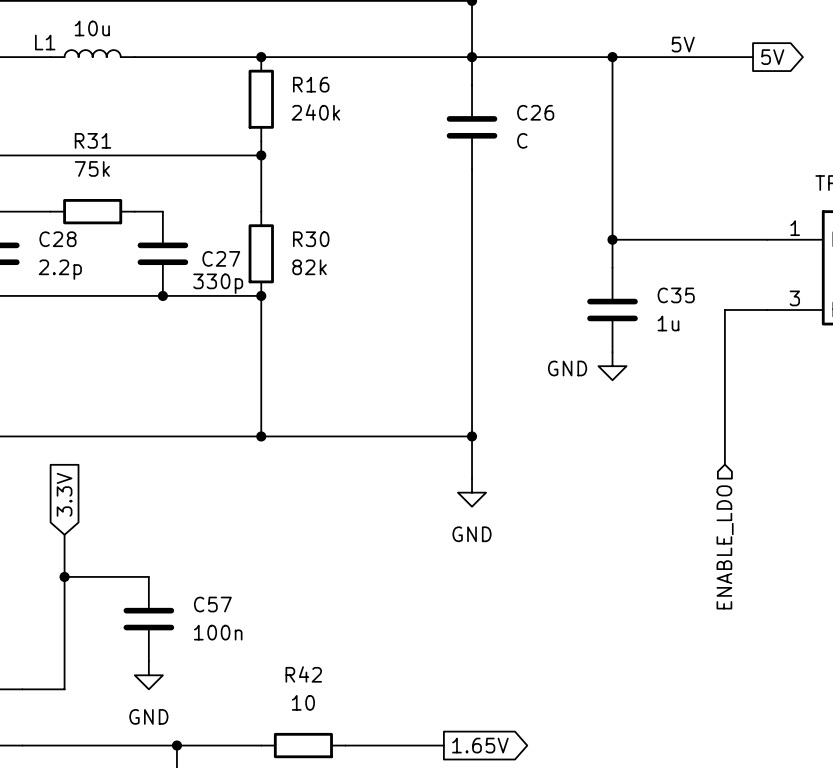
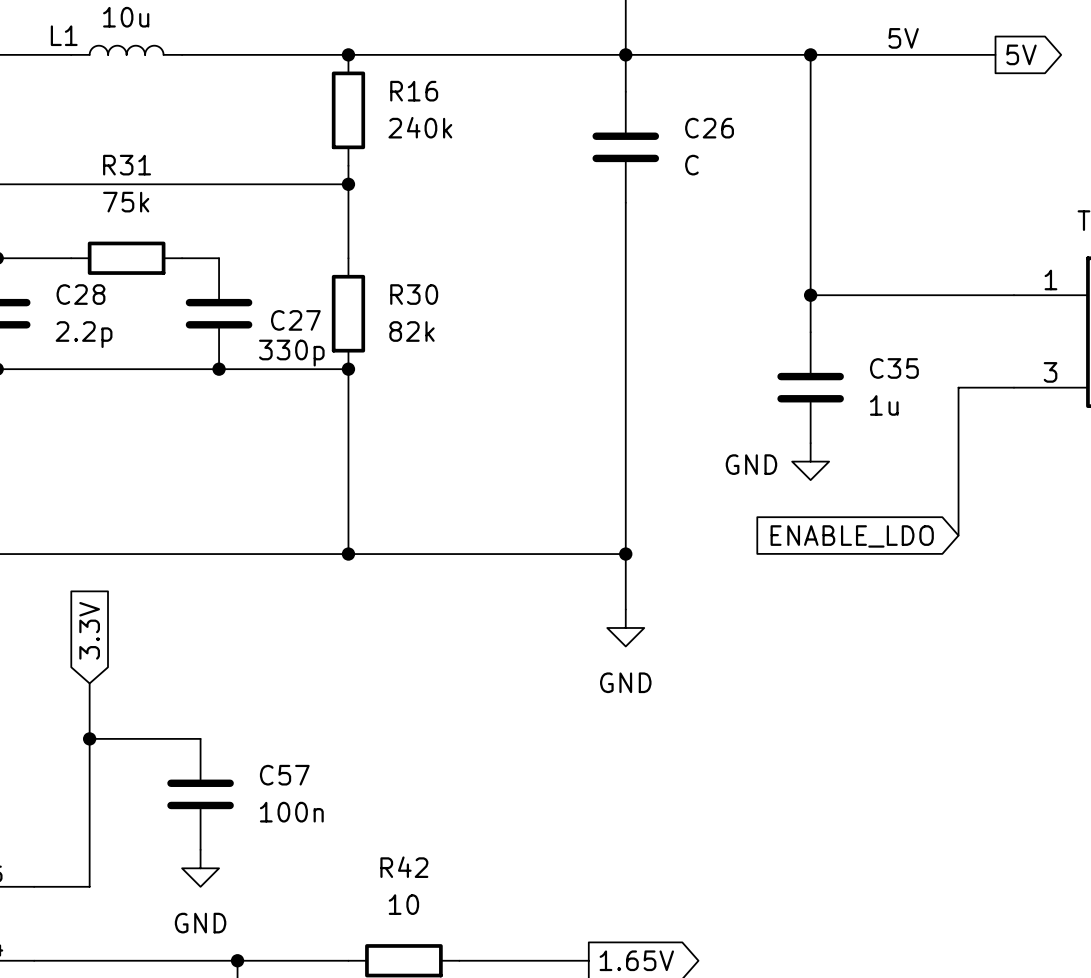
wire: (724, 422) (724, 464) -> none
global label: none -> ENABLE_LDO (852, 536)
hierarchical label: ENABLE_LDO (725, 547) -> none

